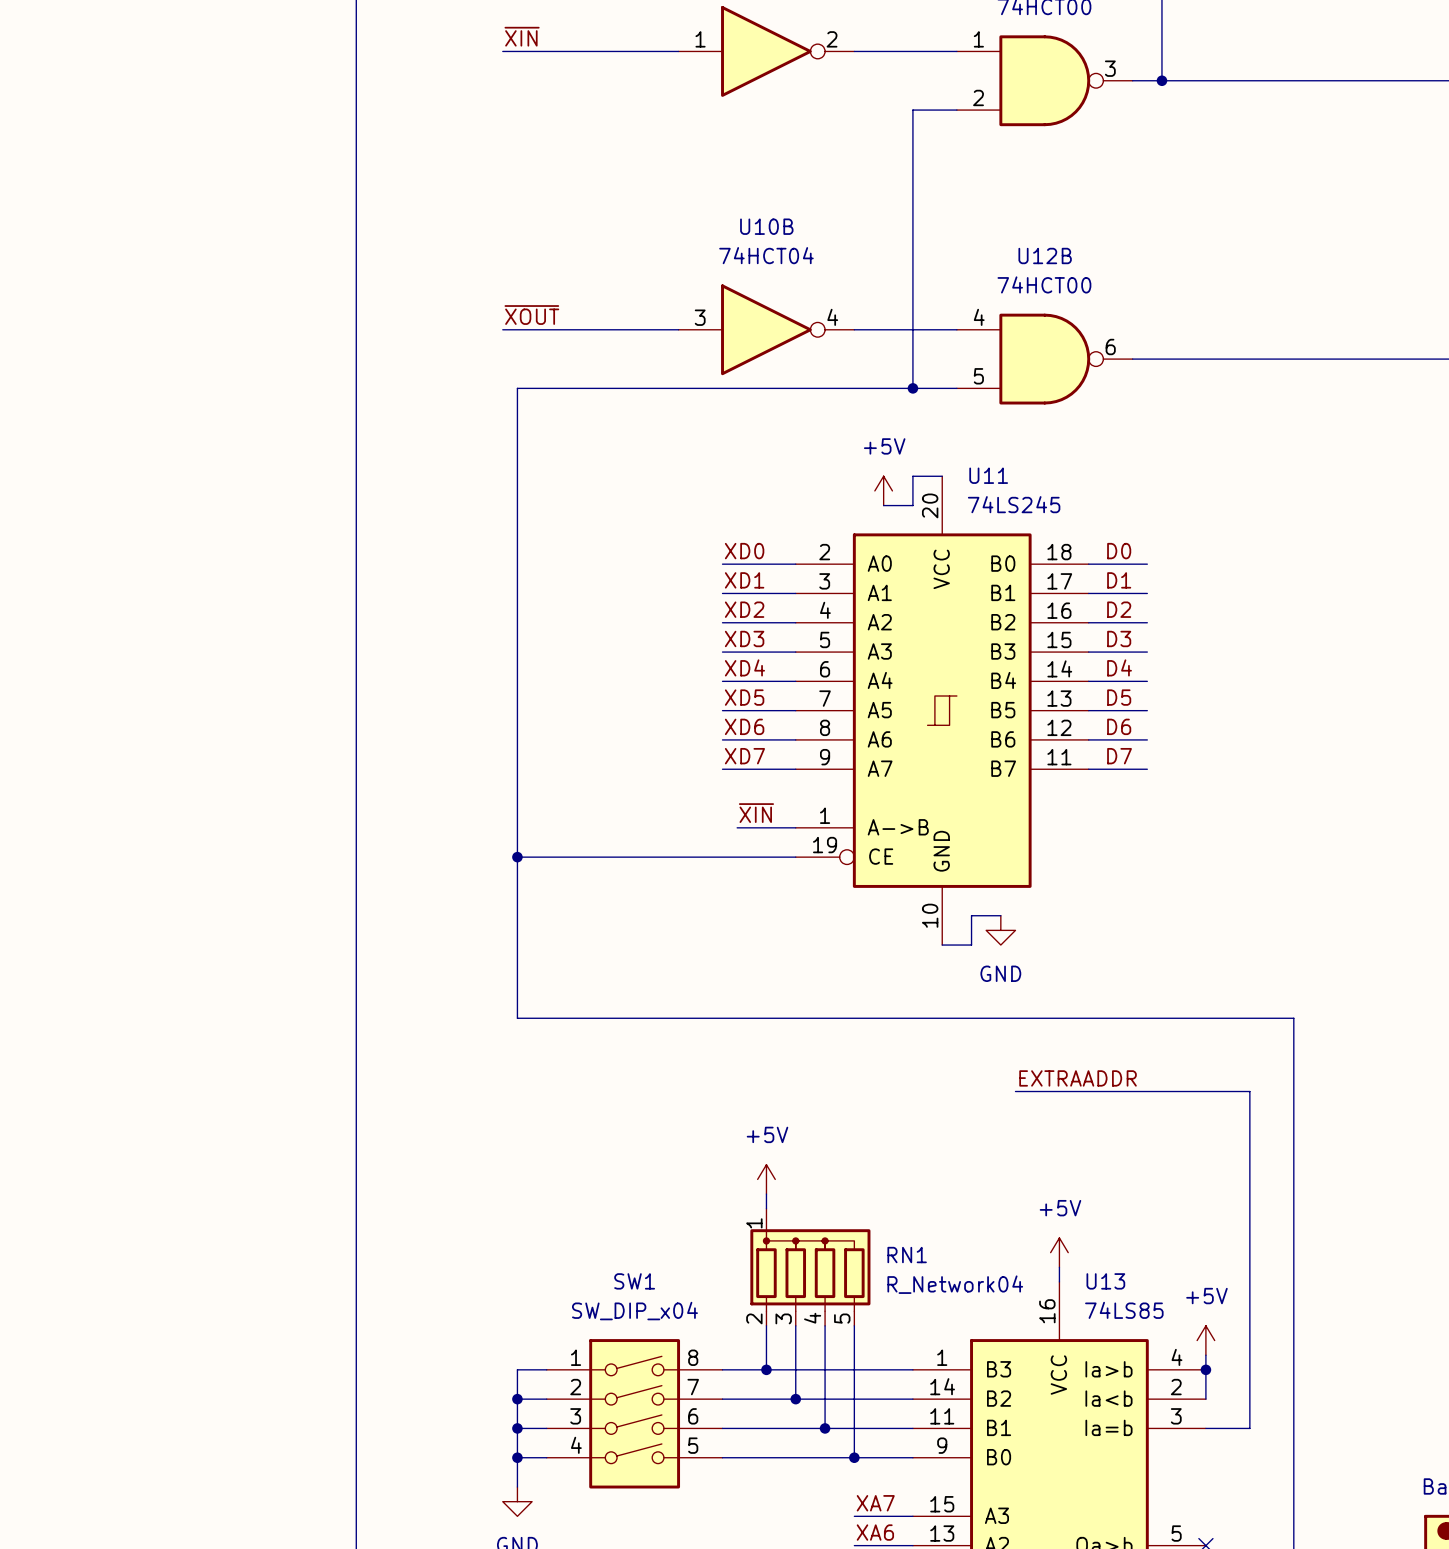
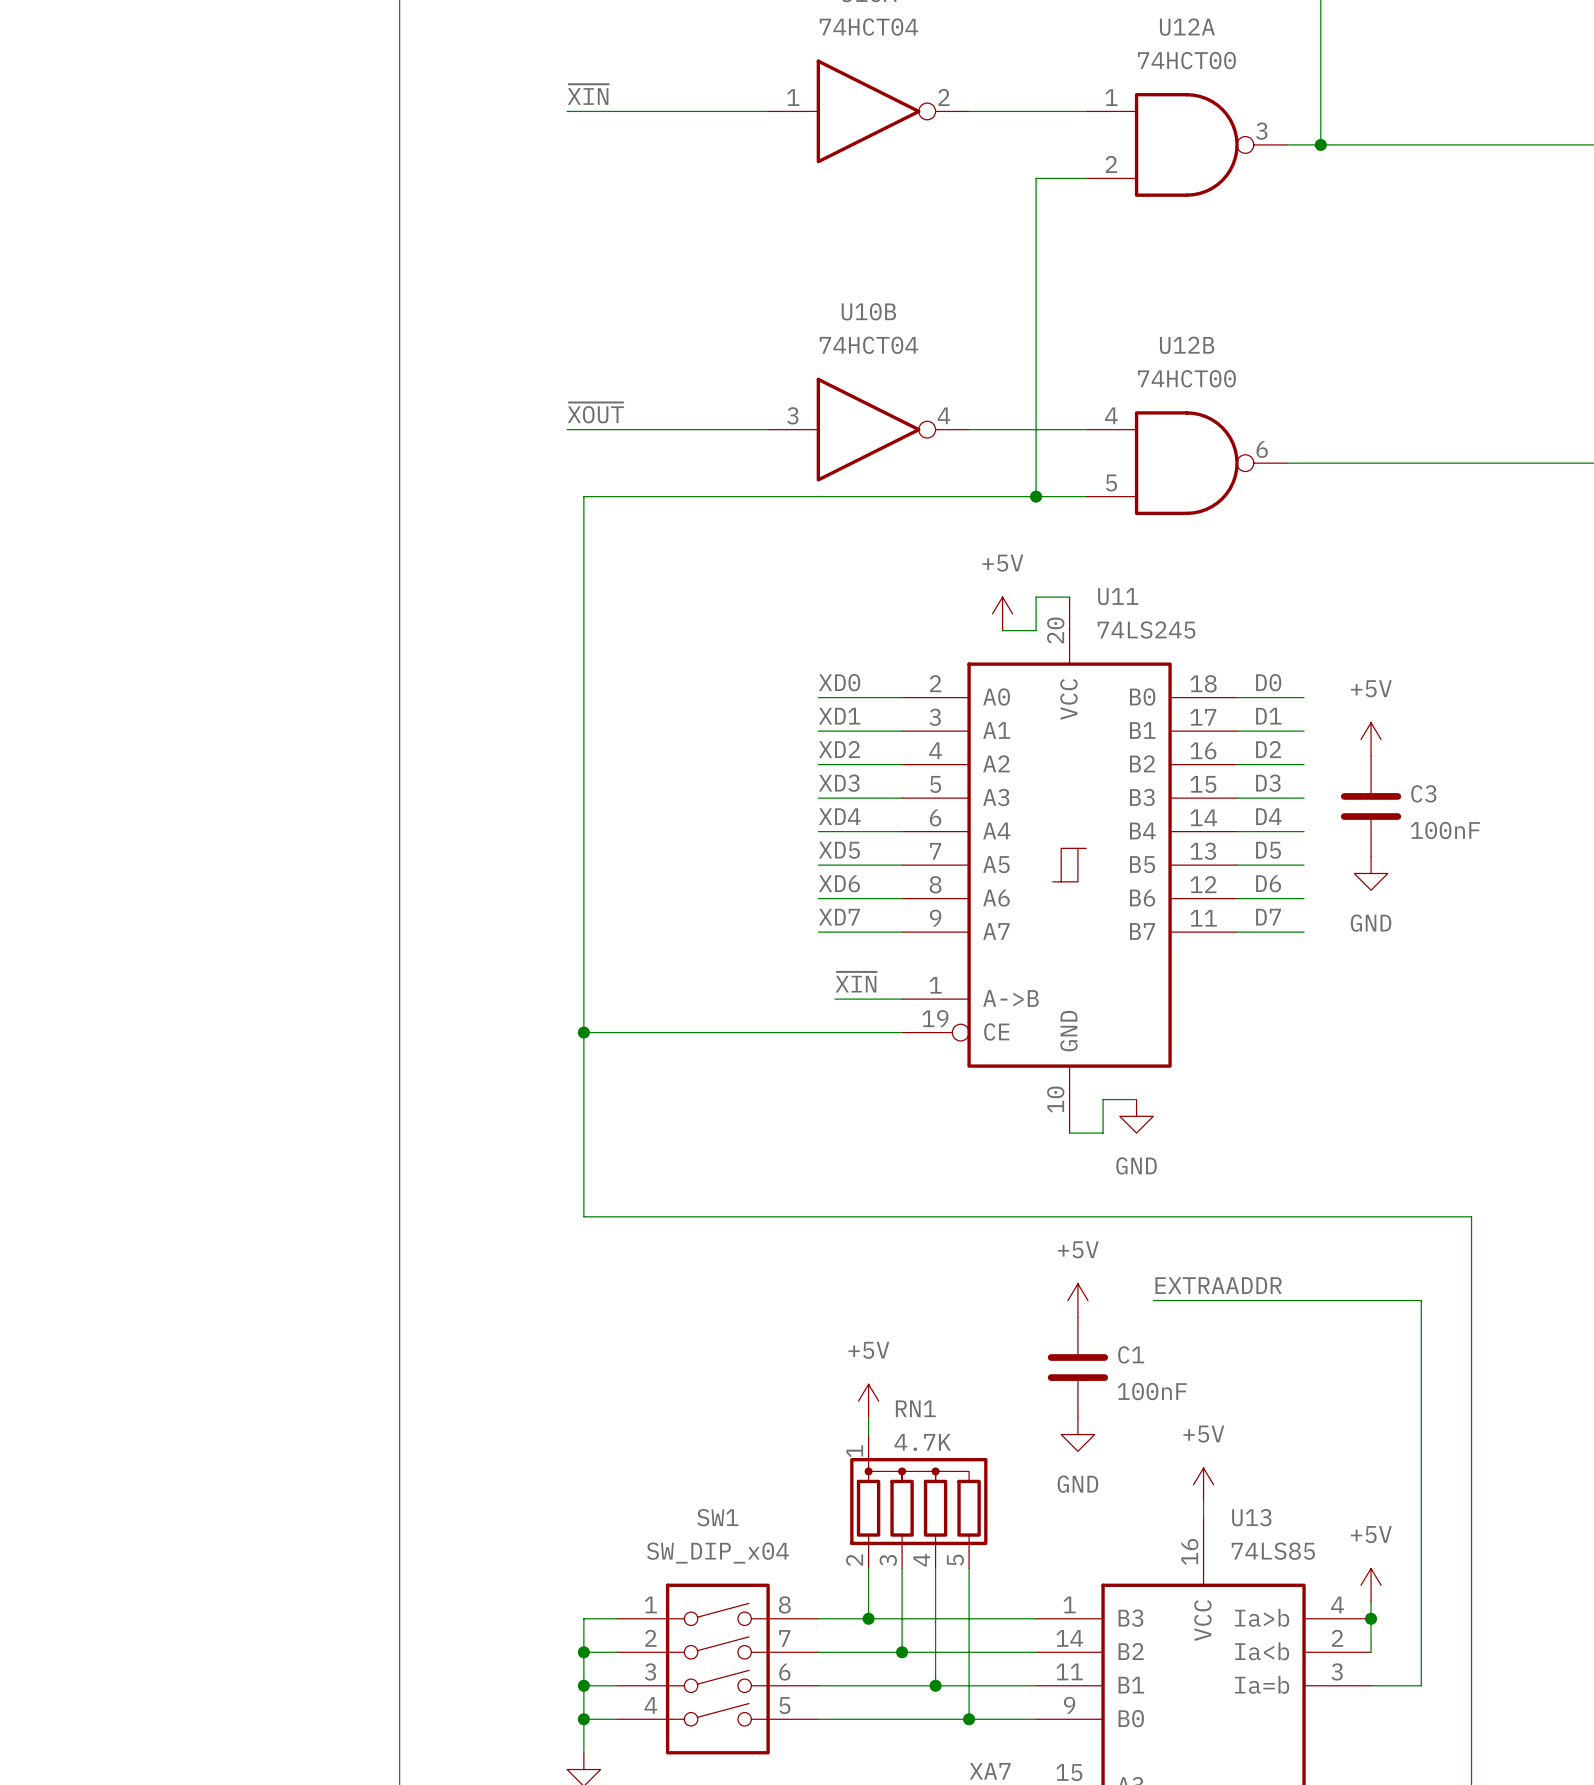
power symbol: none -> +5V (1371, 739)
C3: none -> 100nF (1371, 806)
power symbol: none -> GND (1371, 873)
power symbol: none -> +5V (1077, 1300)
C1: none -> 100nF (1077, 1367)
power symbol: none -> GND (1077, 1434)
RN1 name position: RN1 (907, 1255) -> RN1 (915, 1408)
RN1 value: R_Network04 (955, 1284) -> 4.7K (922, 1442)

